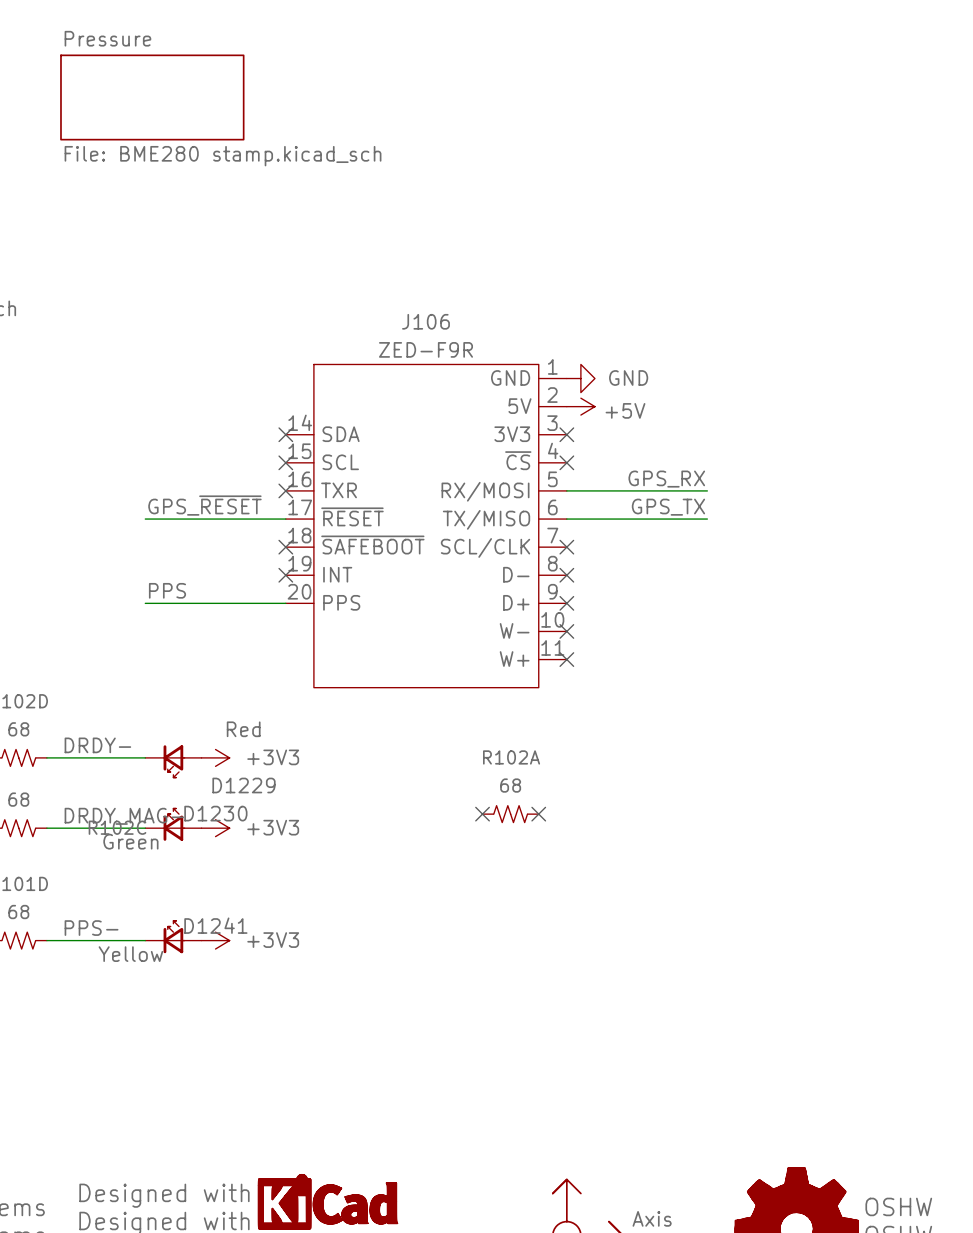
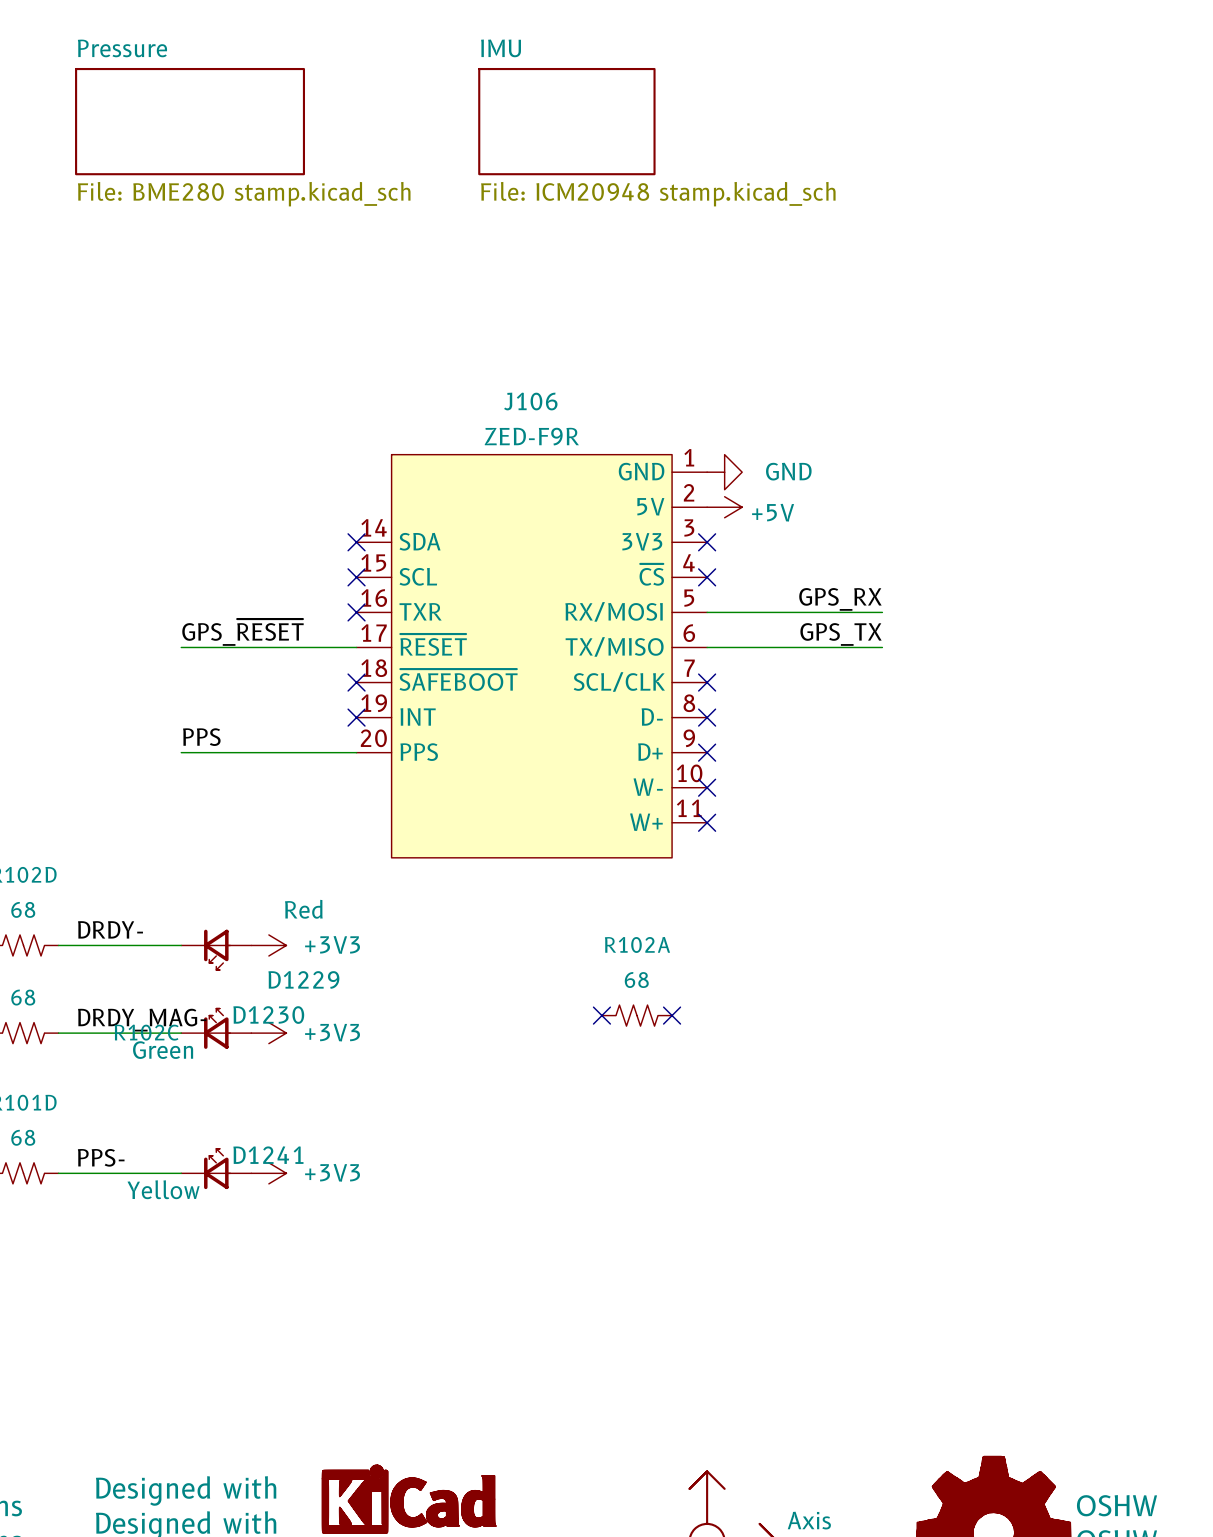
sheet IMU: none -> File: ICM20948 stamp.kicad_sch (566, 121)

